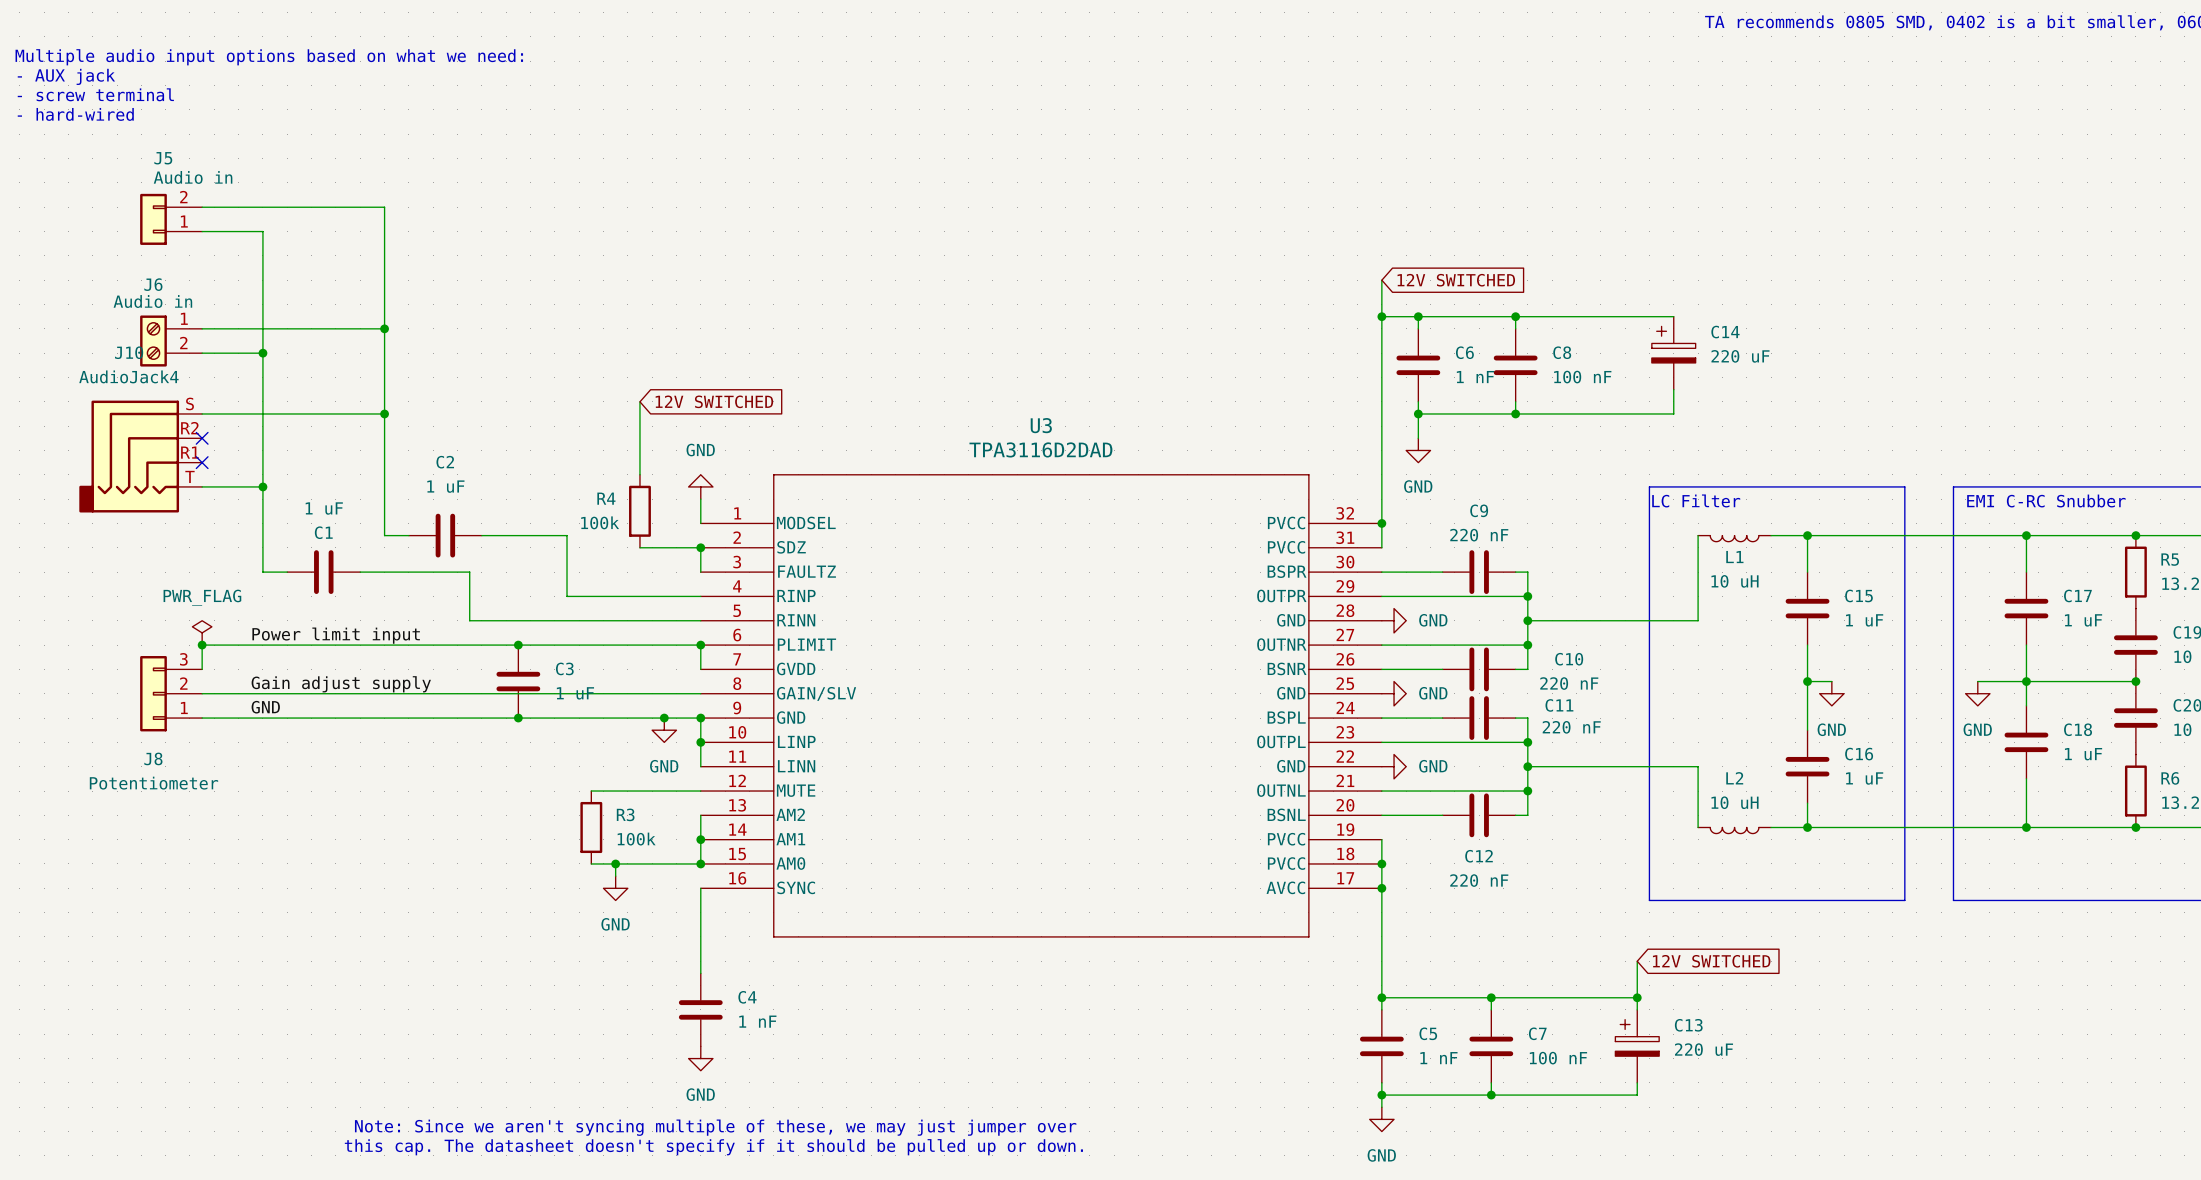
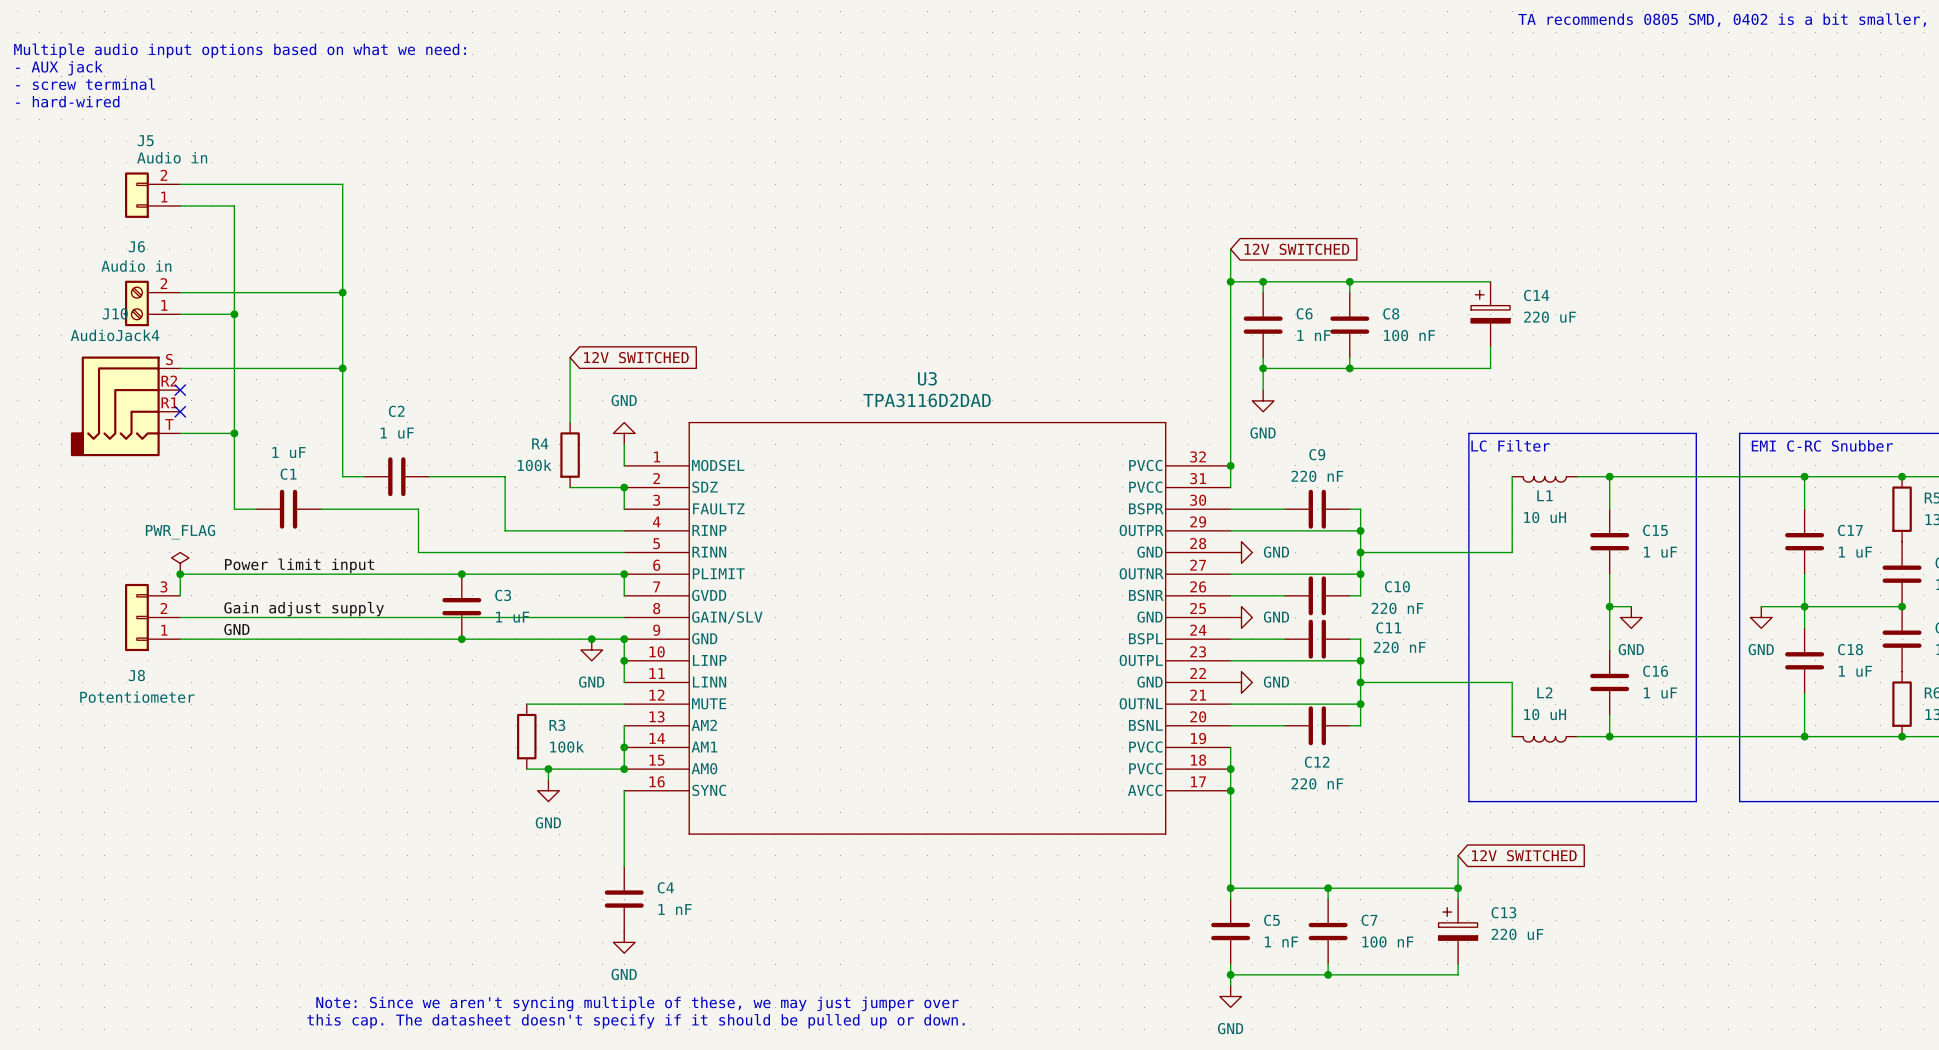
J6 flip: as is (153, 341) -> up-down (136, 303)

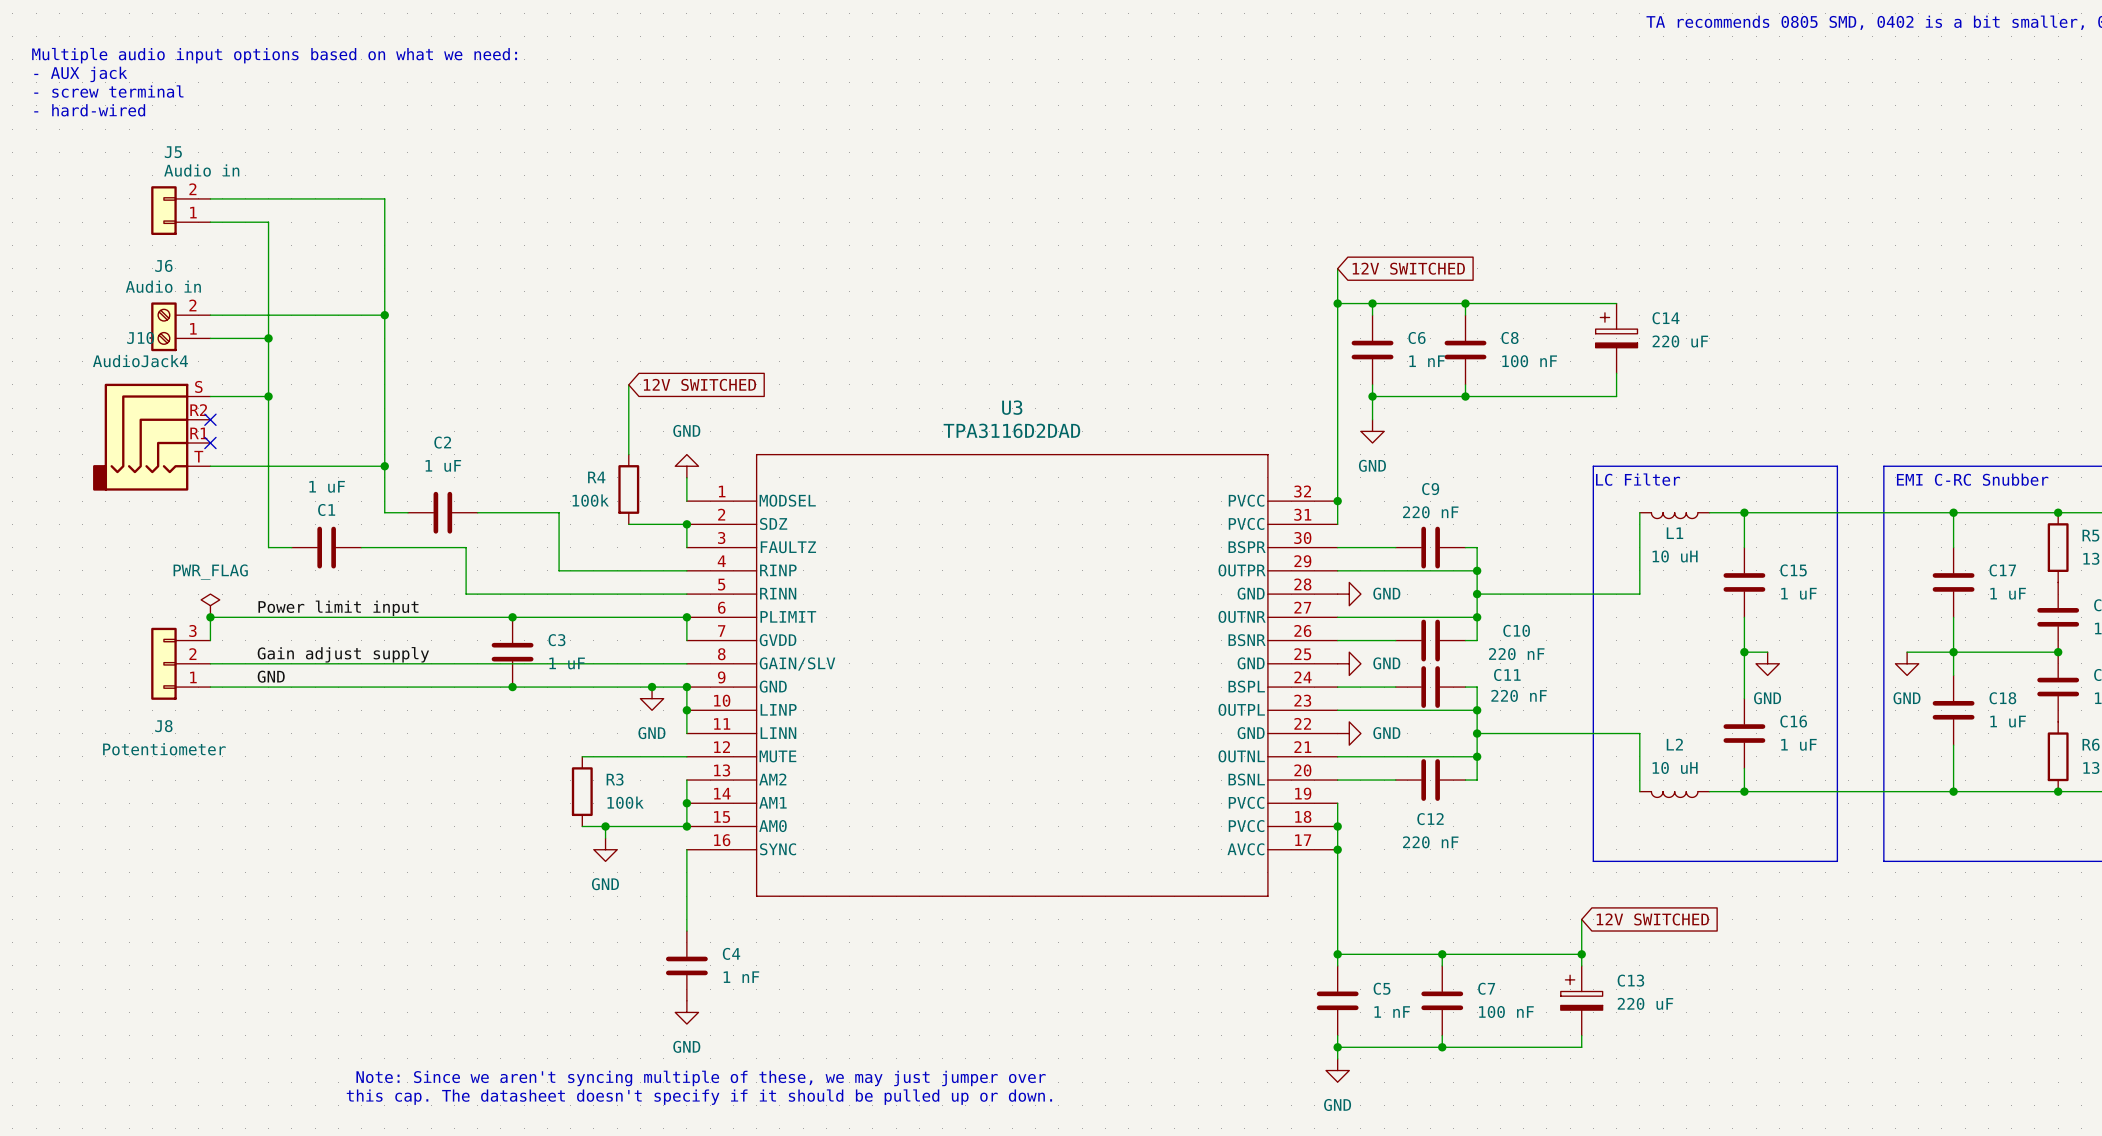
wire: (234, 368) (342, 368) -> (268, 466) (384, 466)
junction: none -> (268, 396)
junction: (342, 368) -> none
junction: (234, 433) -> none
junction: none -> (384, 466)

